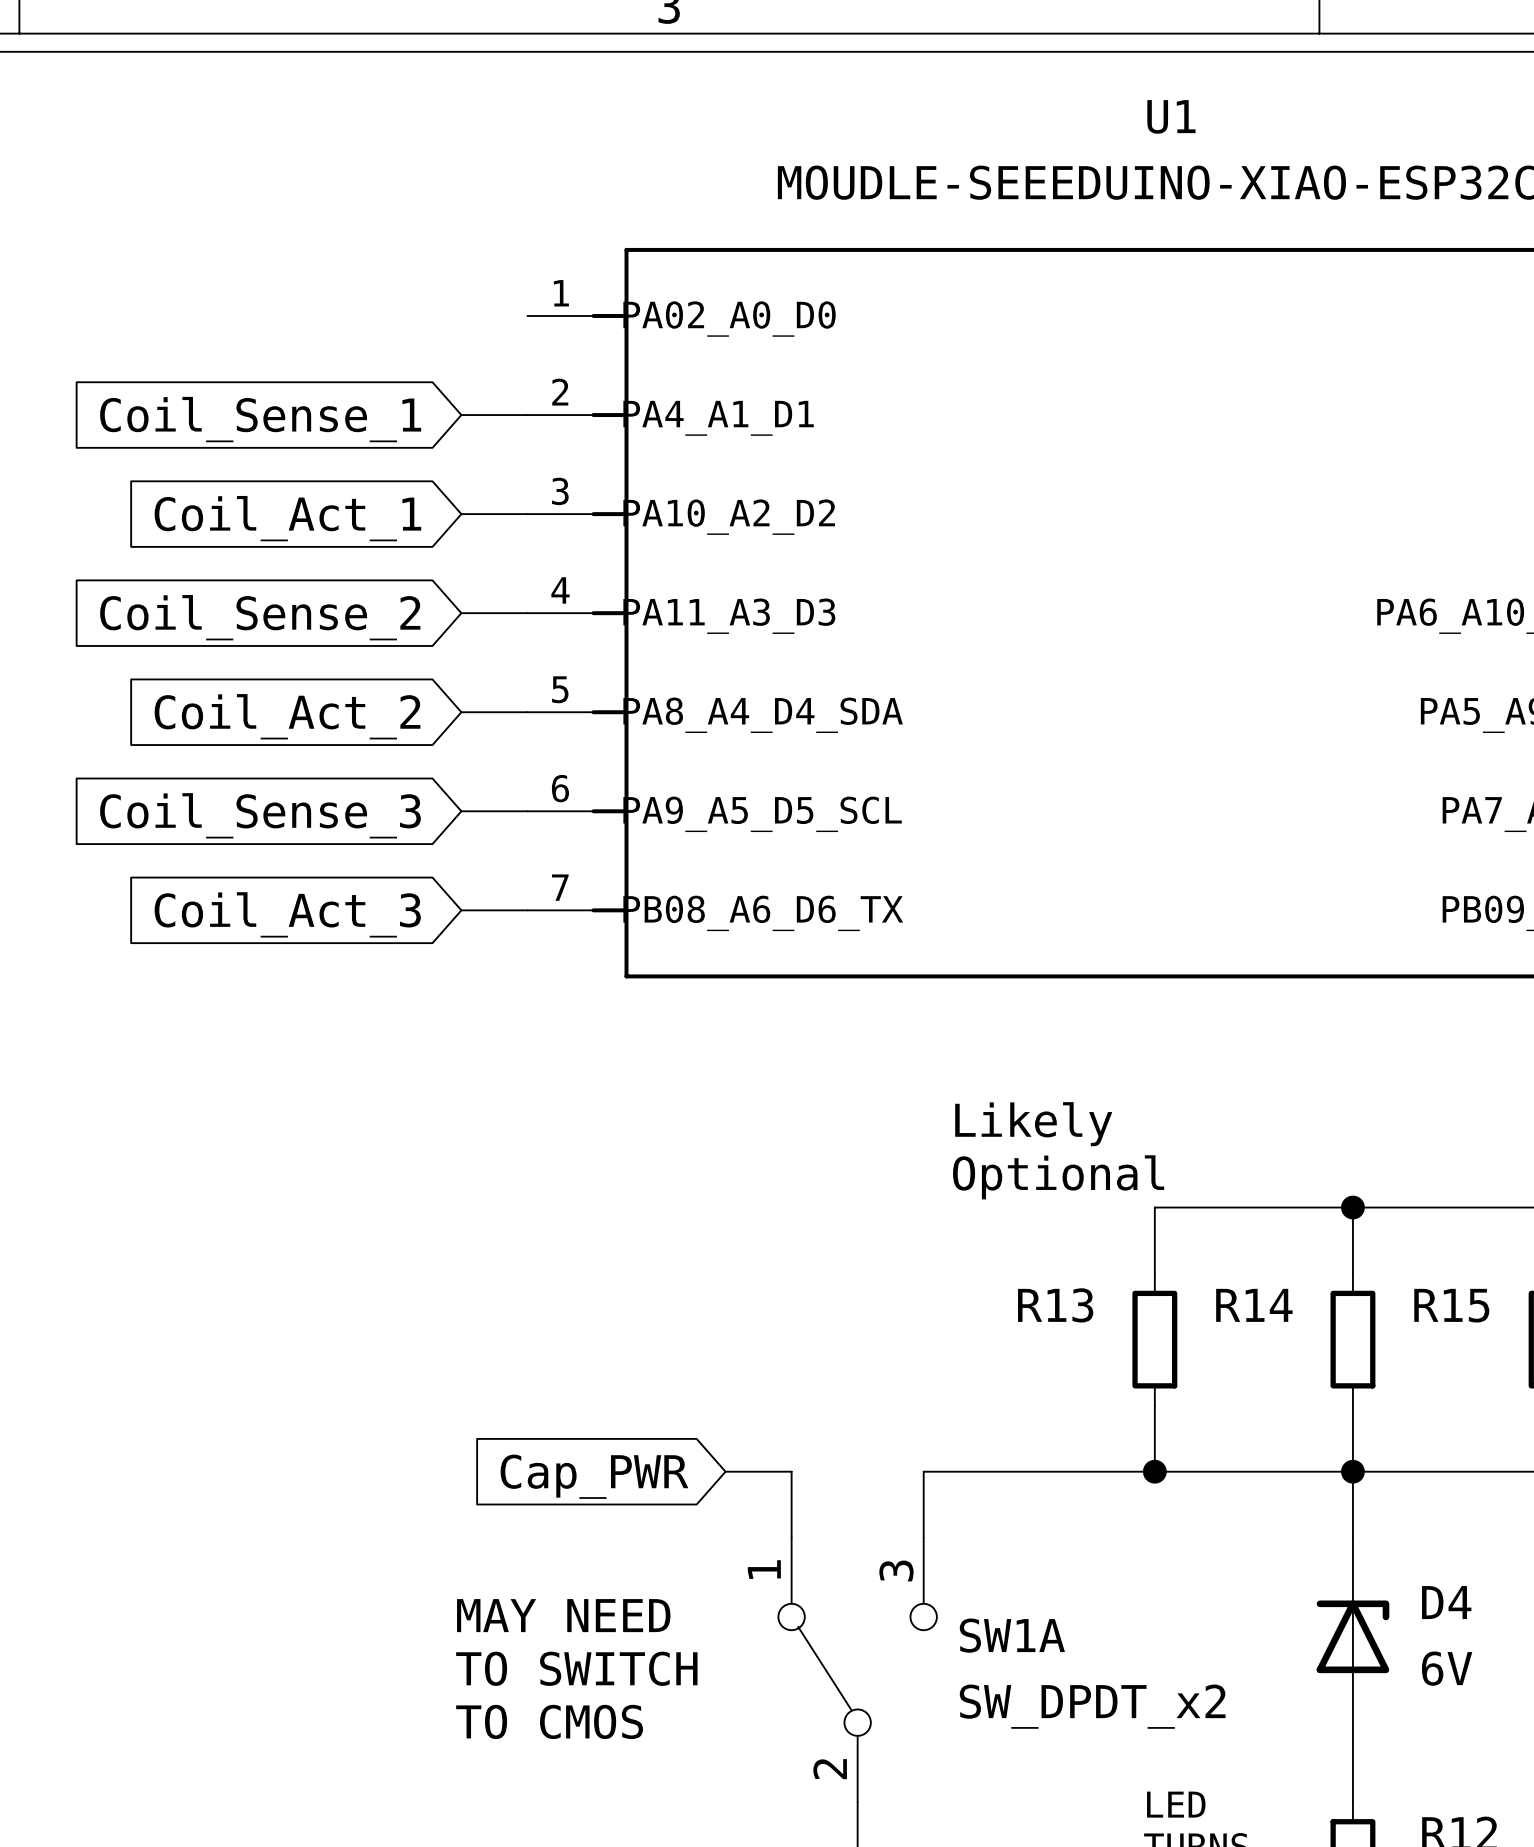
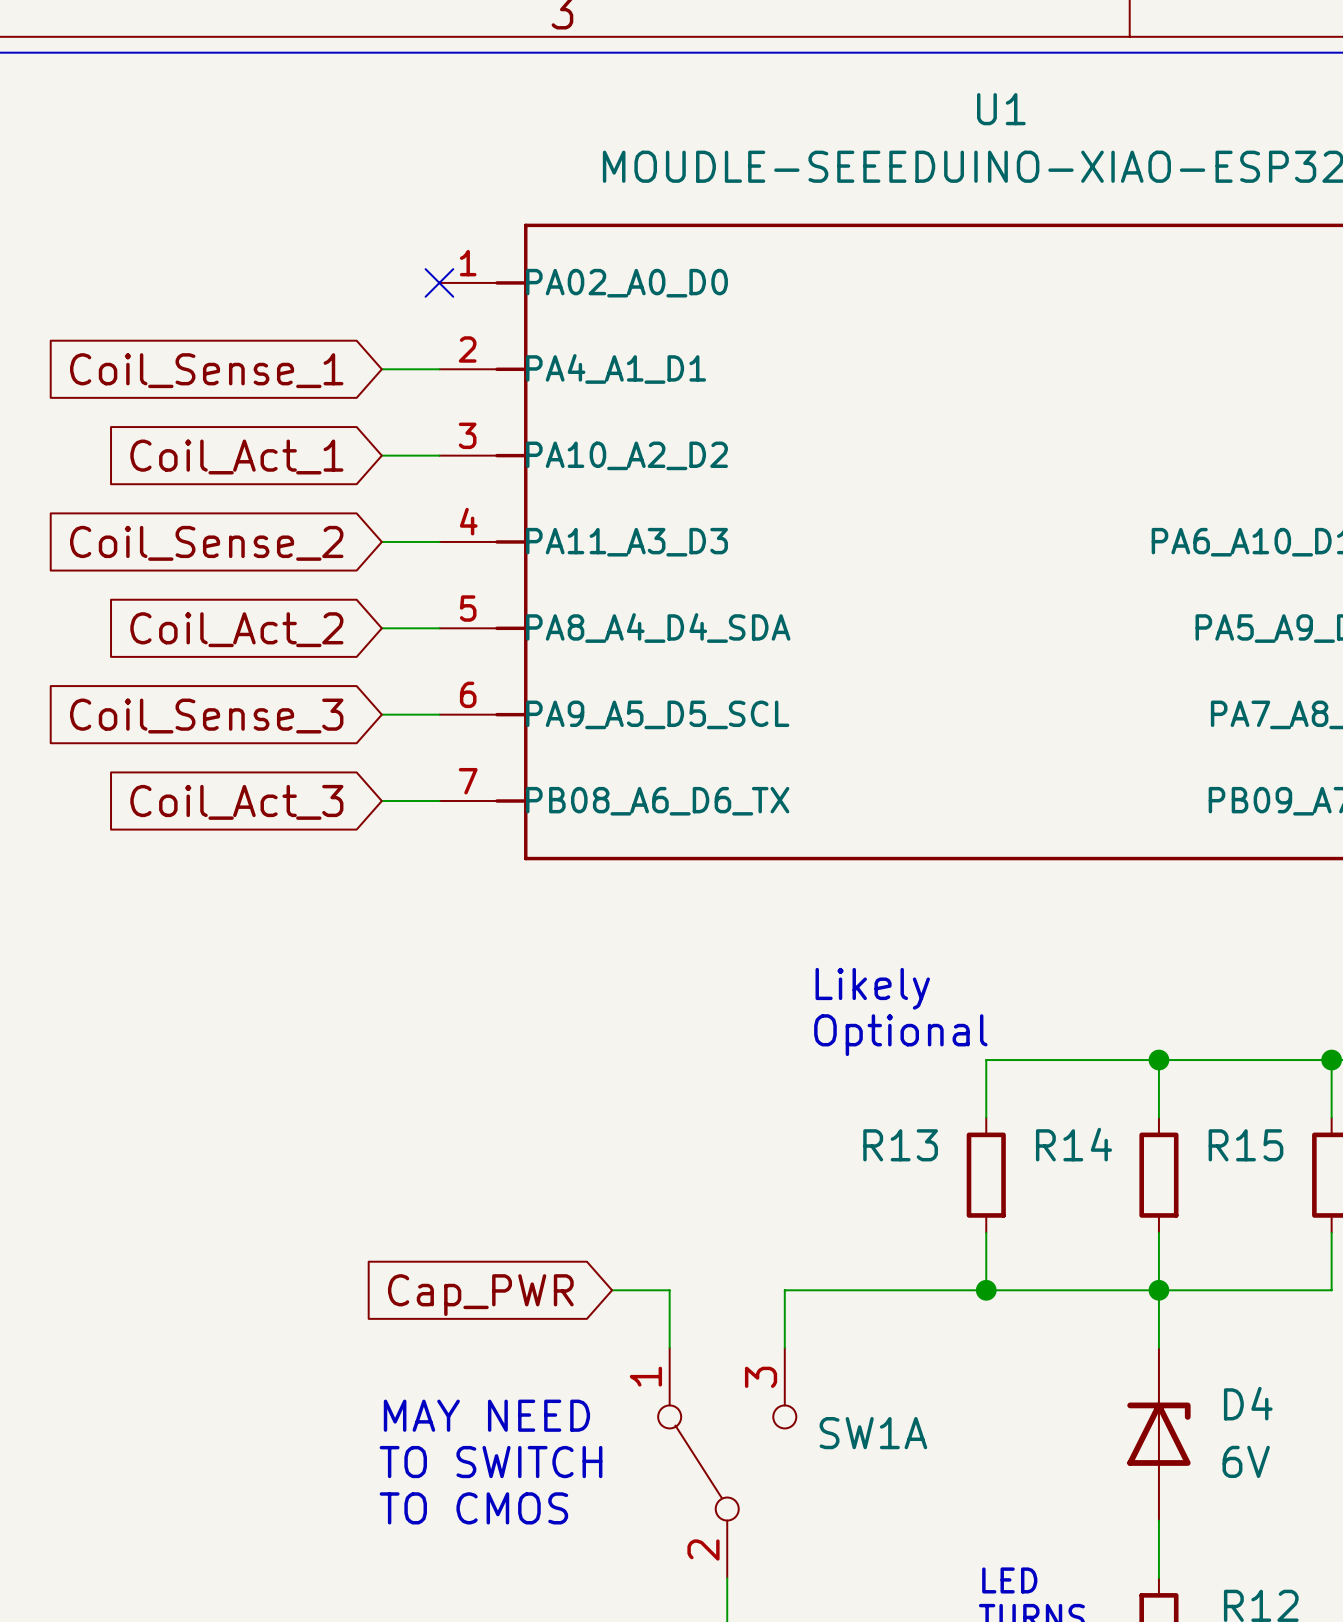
no-connect mark: none -> (439, 282)
SW1A value: SW_DPDT_x2 (1092, 1706) -> none

